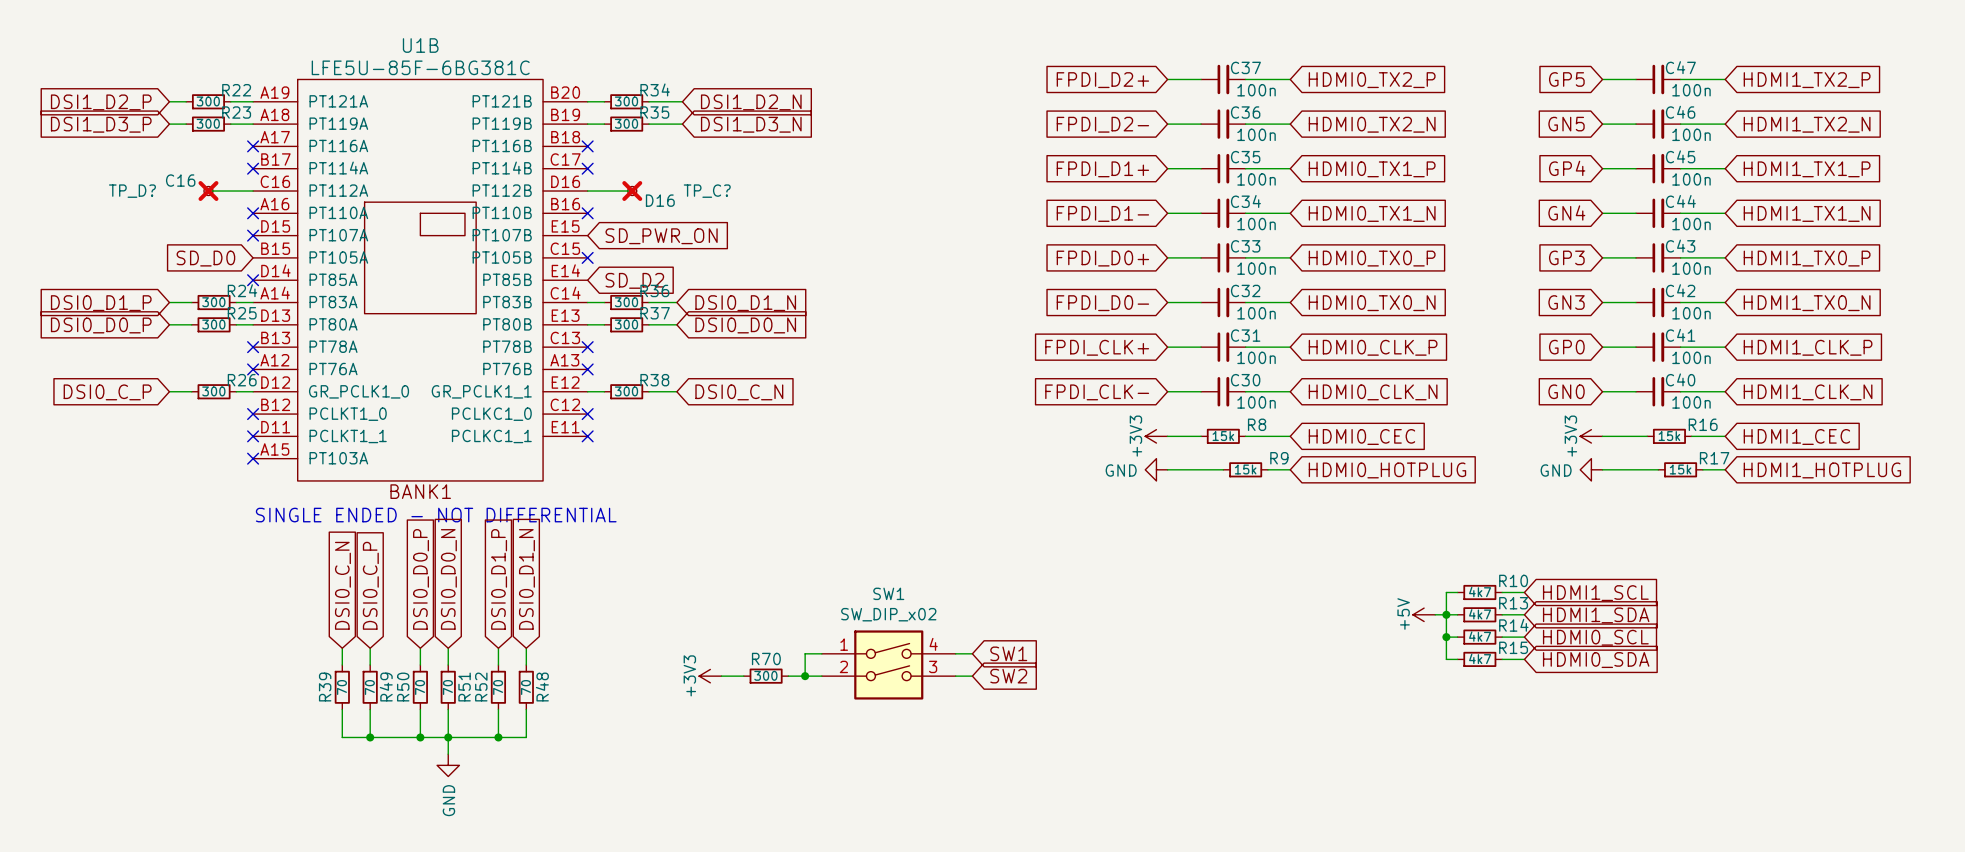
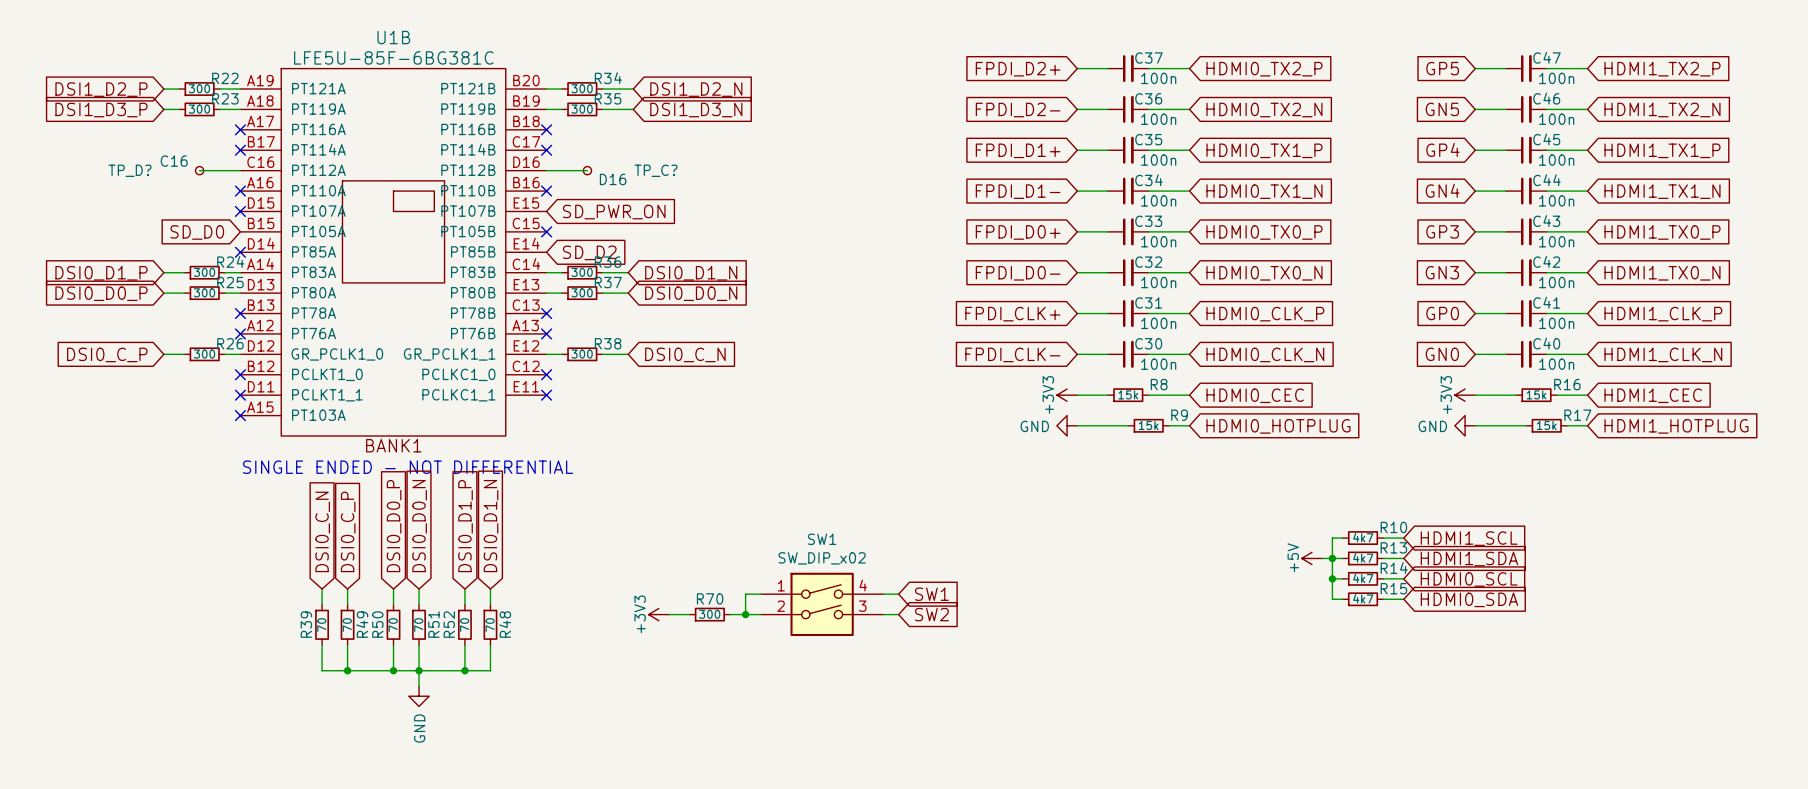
TP_D? do-not-place cross: (208, 191) -> none
TP_C? do-not-place cross: (632, 191) -> none

